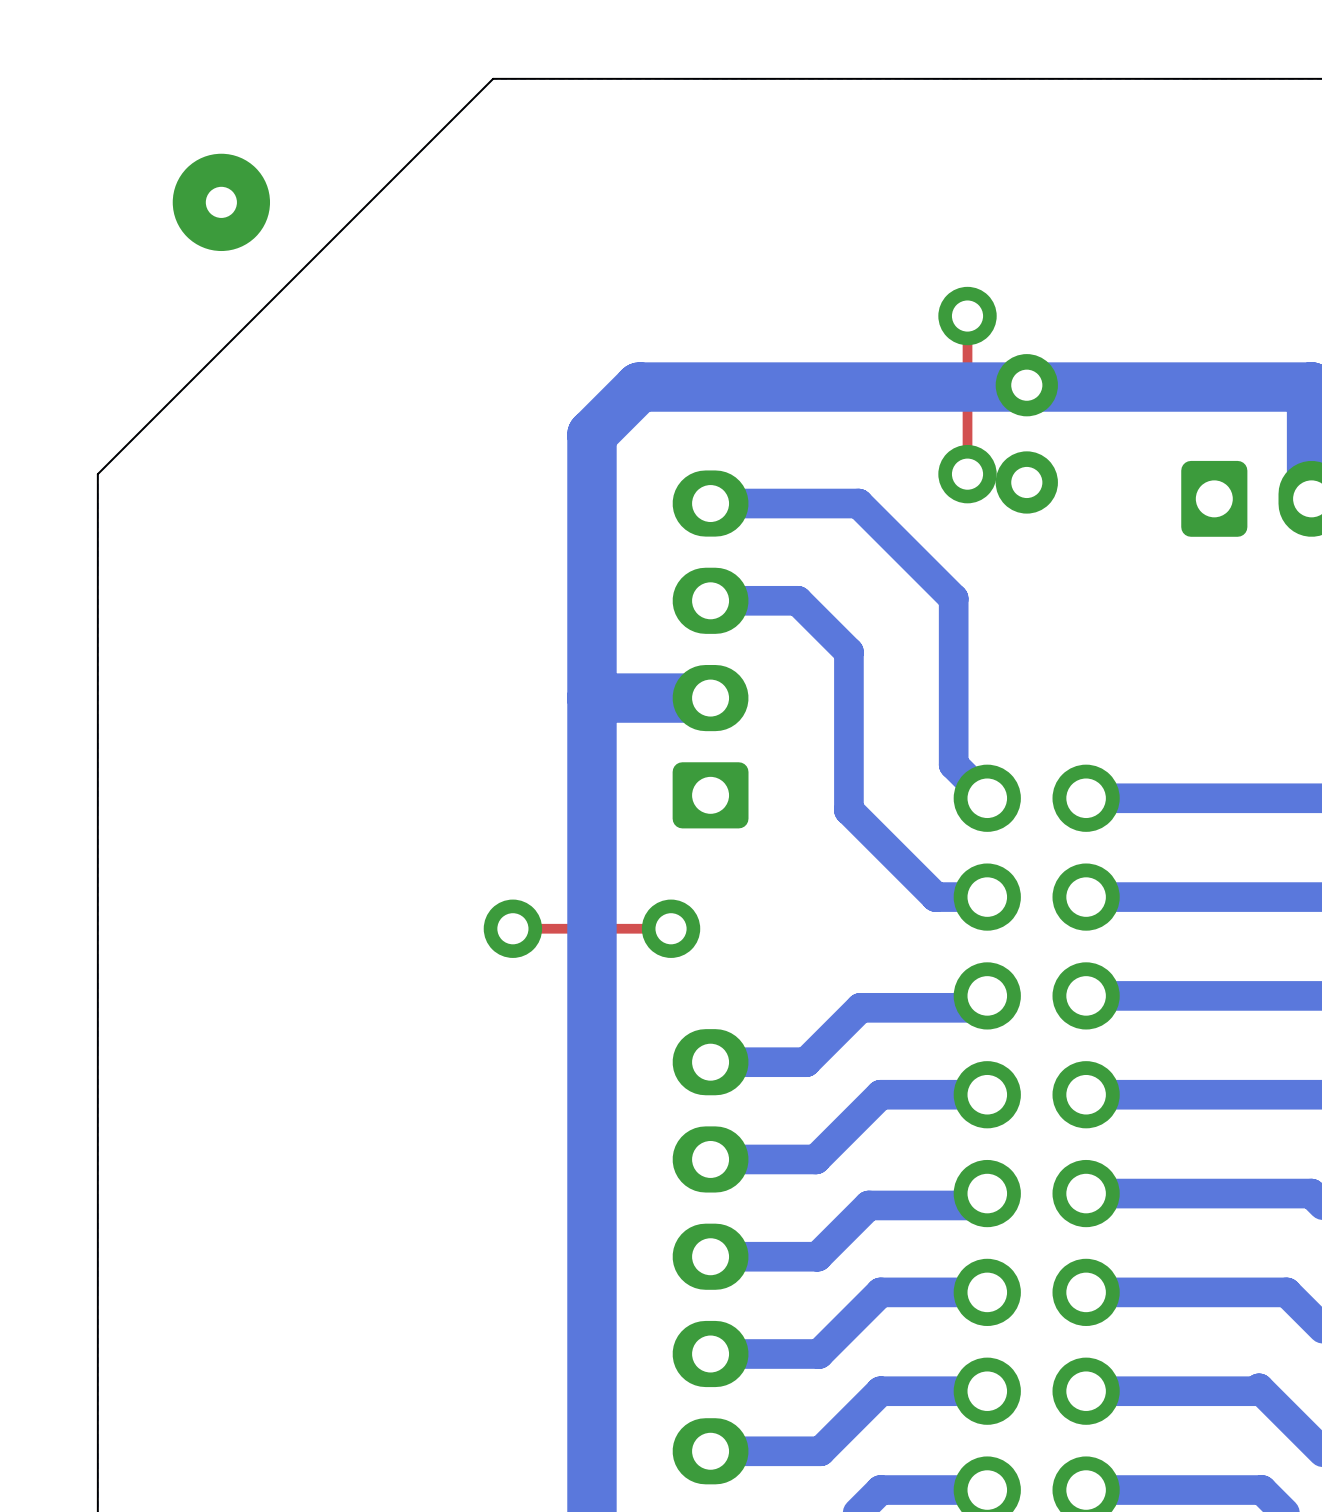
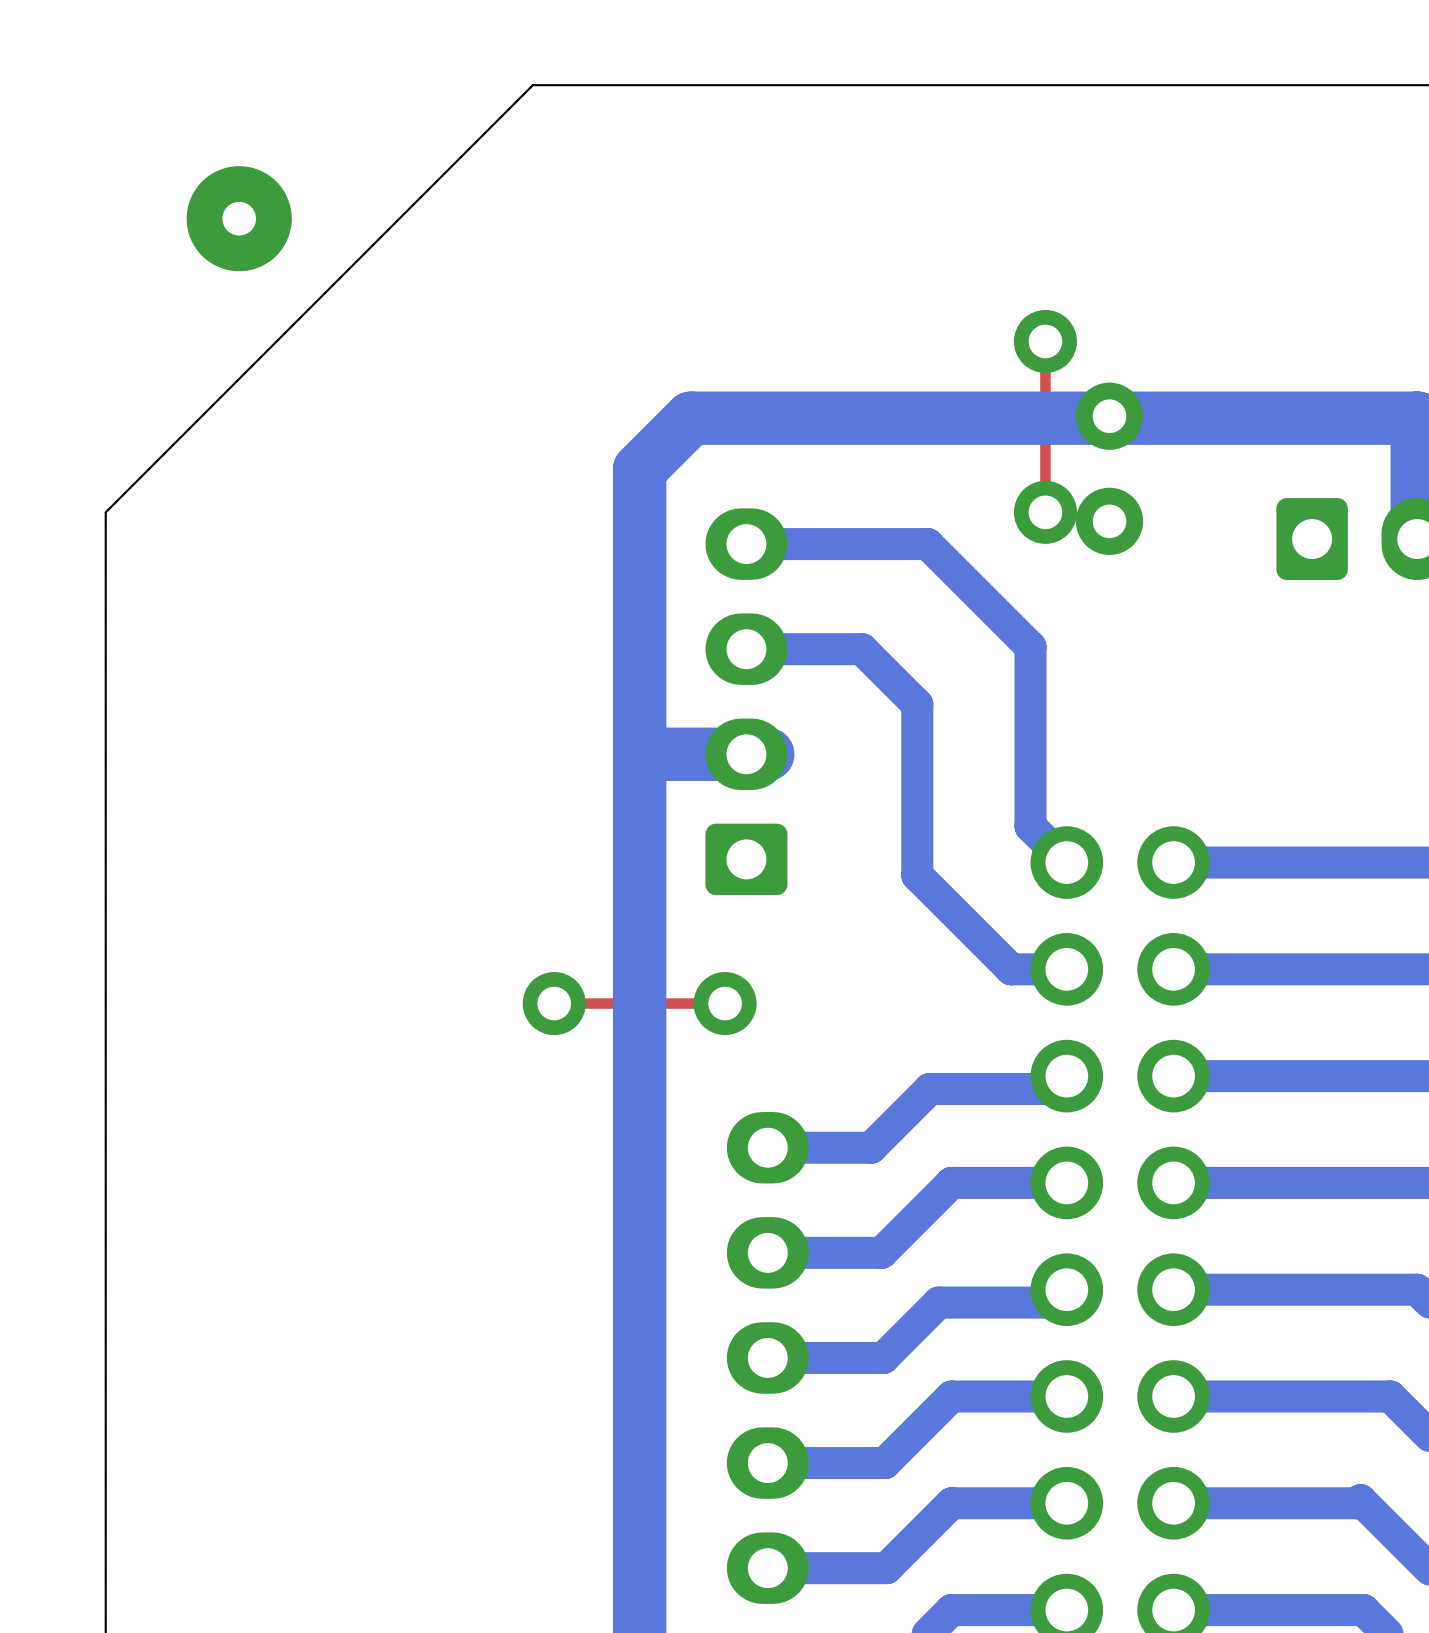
part position: (710, 649) -> (746, 701)

